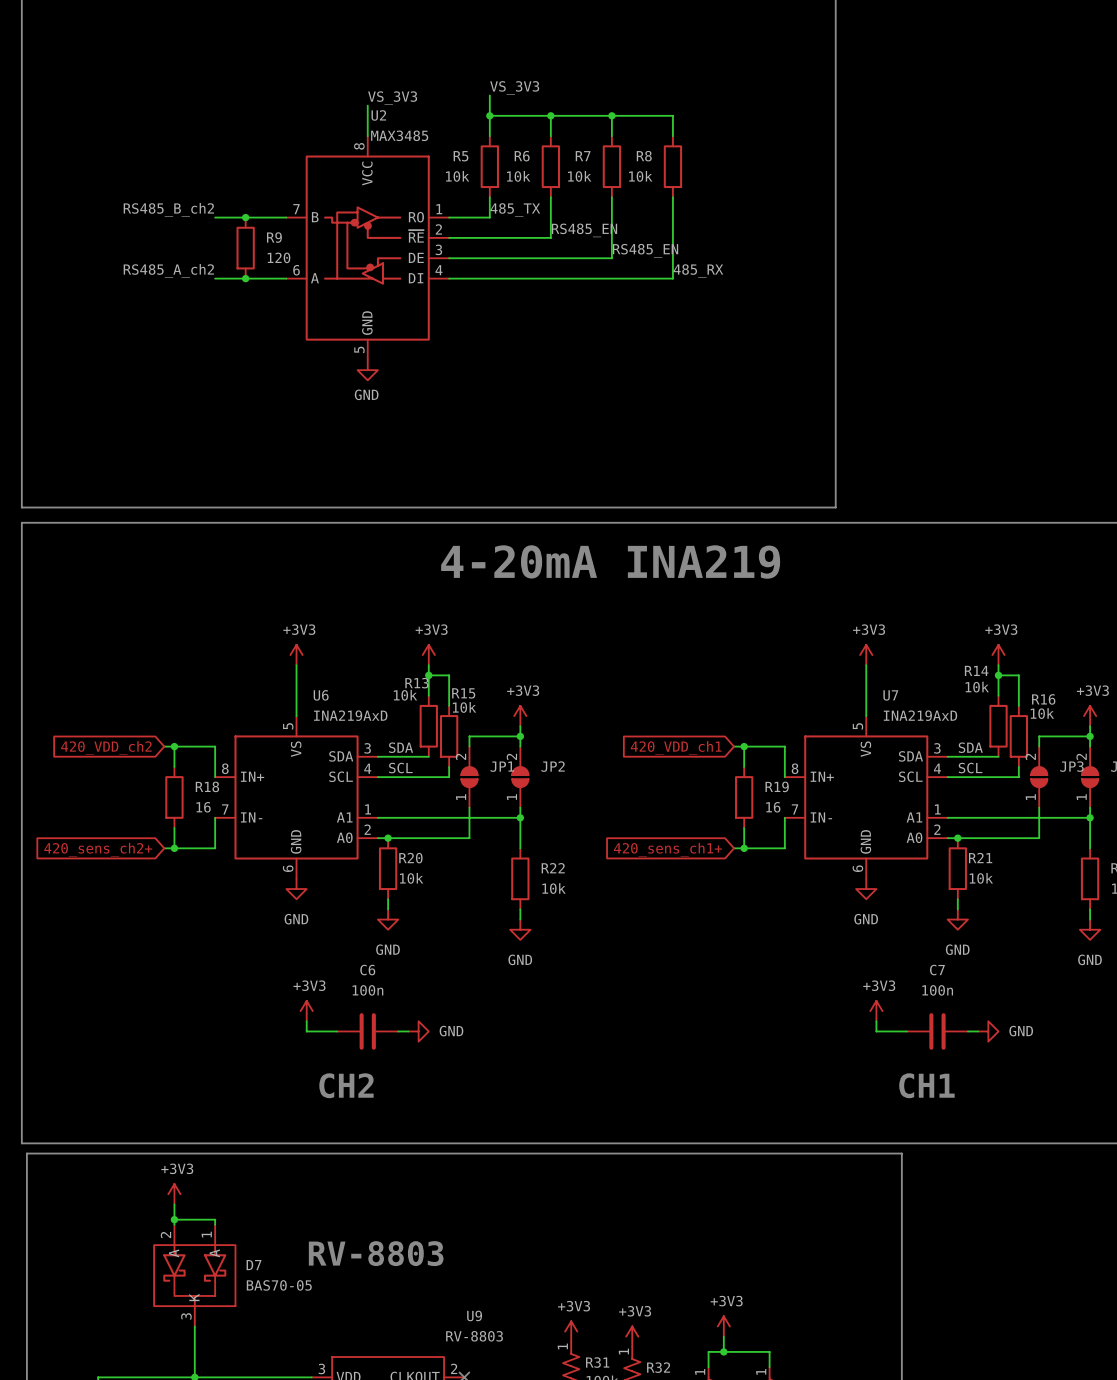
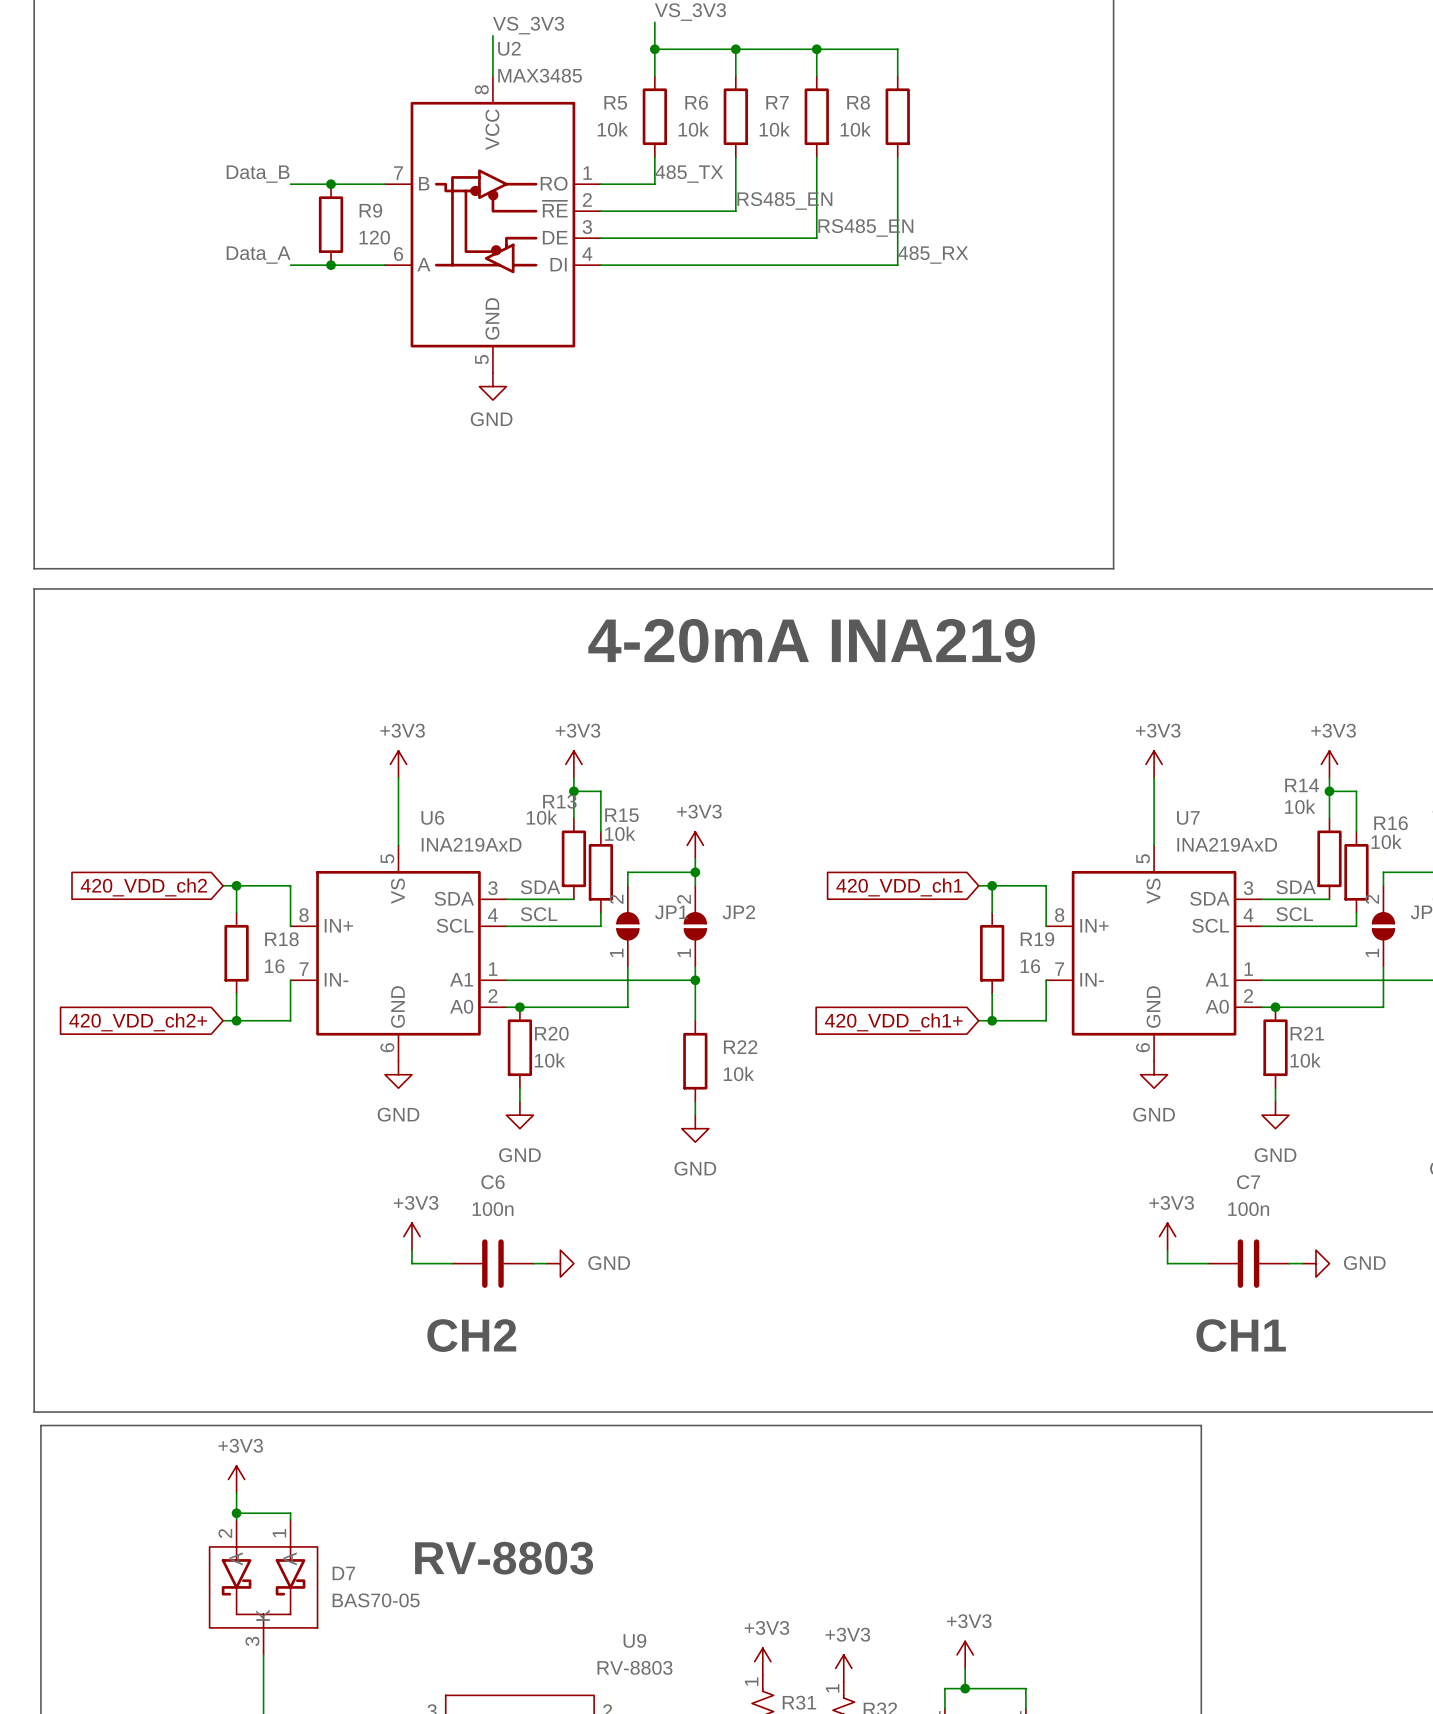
label: RS485_B_ch2 (168, 209) -> Data_B (258, 174)
label: RS485_A_ch2 (168, 270) -> Data_A (258, 255)
global label: 420_sens_ch2+ (98, 849) -> 420_VDD_ch2+ (138, 1022)
global label: 420_sens_ch1+ (667, 849) -> 420_VDD_ch1+ (893, 1022)

